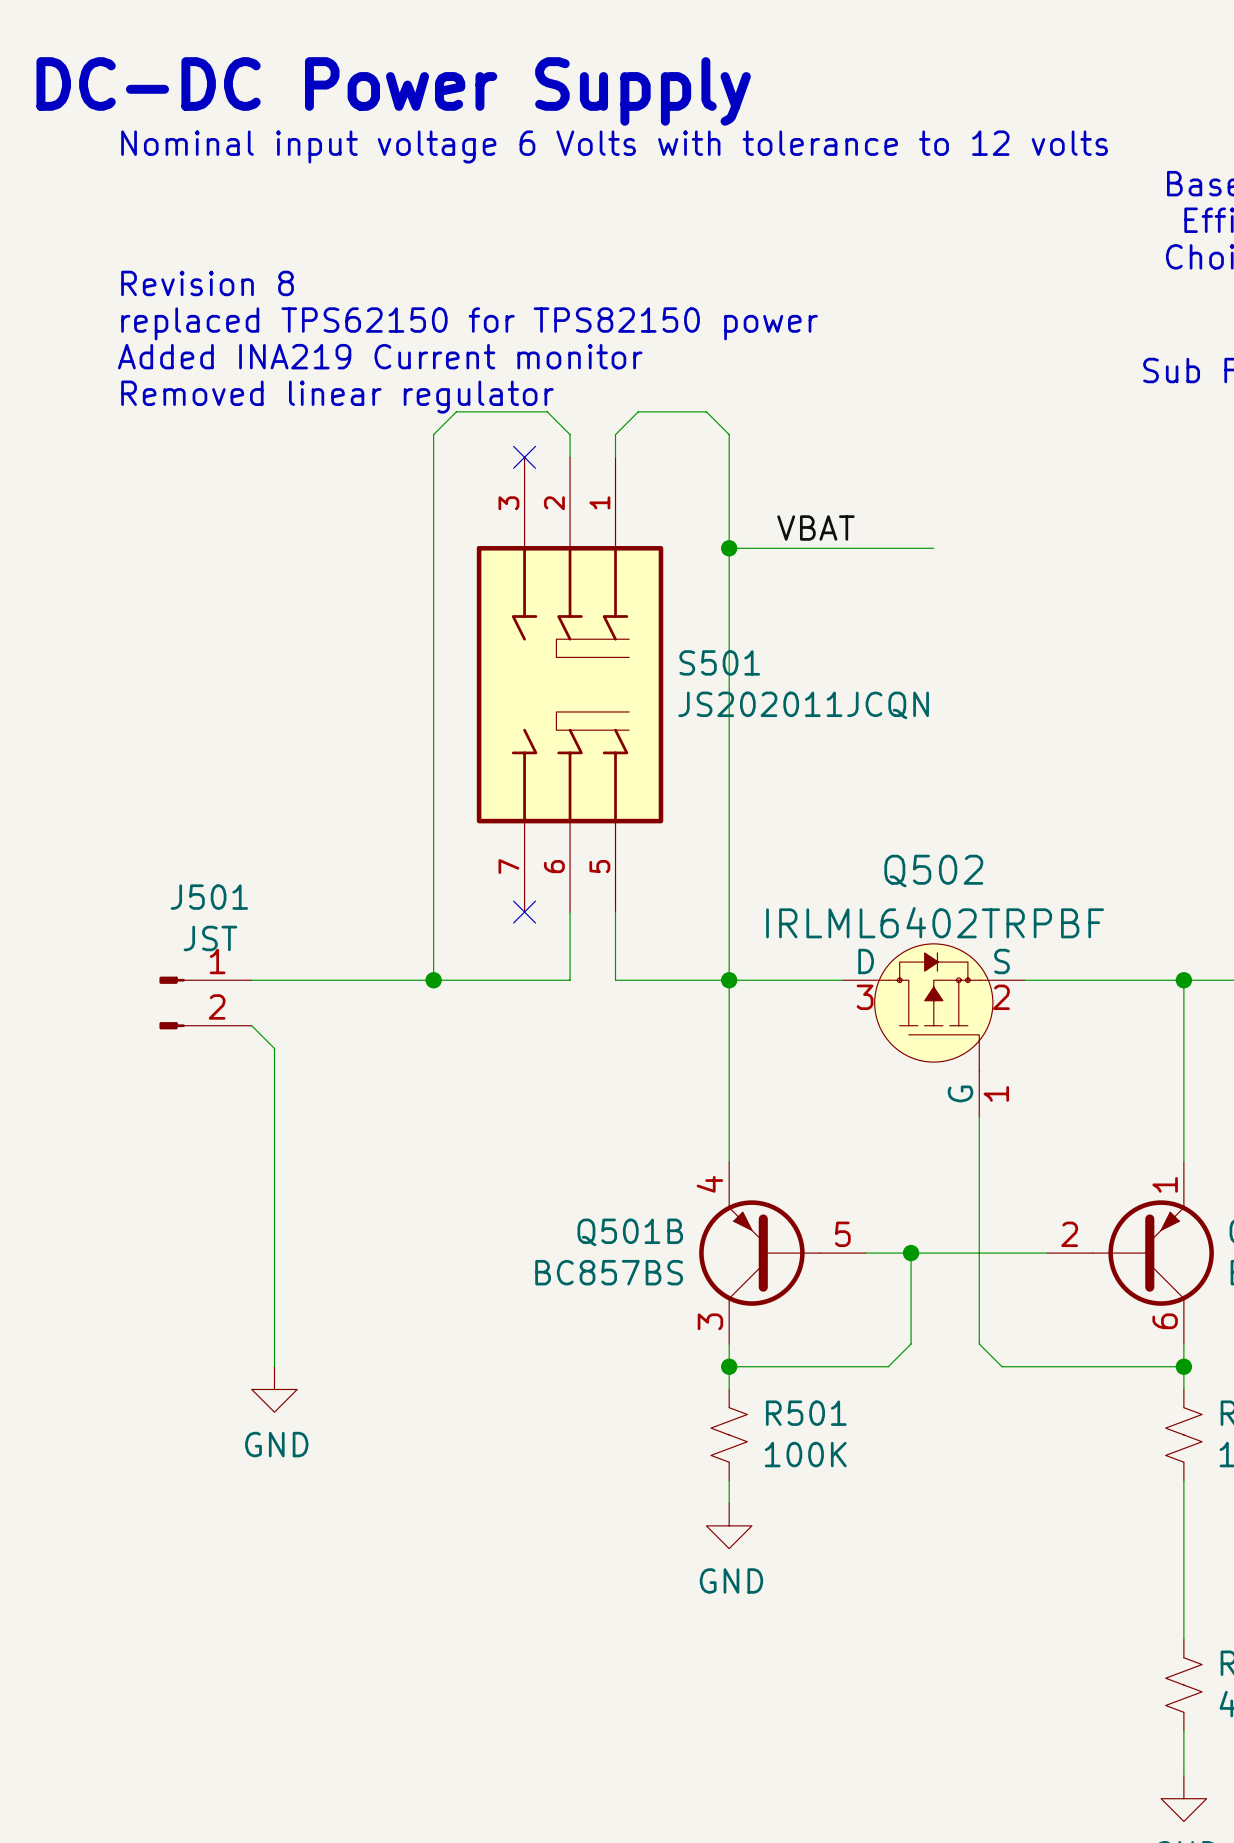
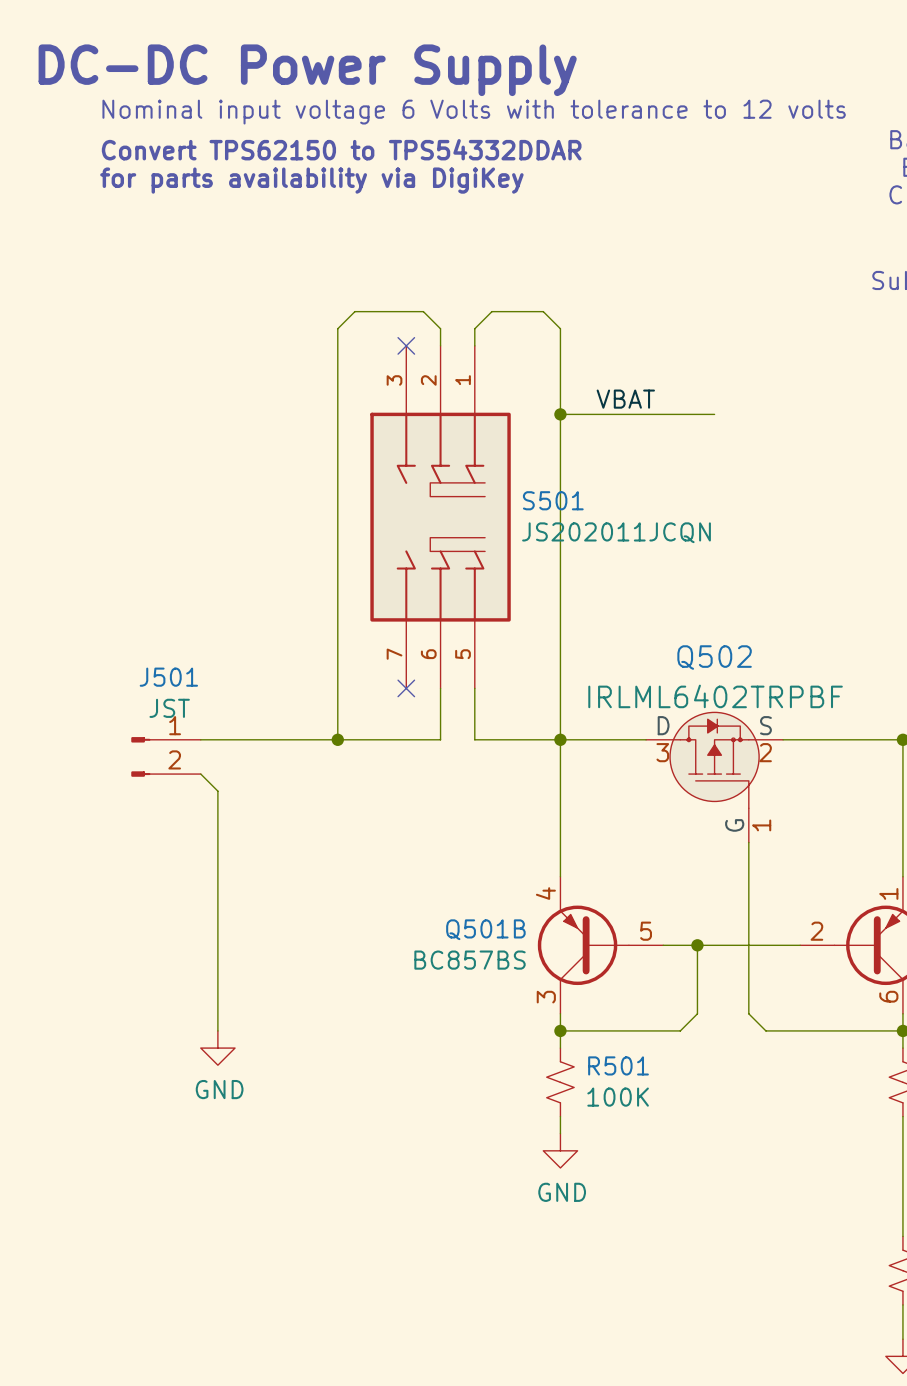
text: none -> Convert TPS62150 to TPS54332DDAR (341, 149)
text: none -> for parts availability via DigiKey (311, 180)
text: Revision 8 (207, 283) -> none
text: replaced TPS62150 for TPS82150 power (469, 323) -> none
text: Added INA219 Current monitor (380, 356) -> none
text: Removed linear regulator (337, 397) -> none

